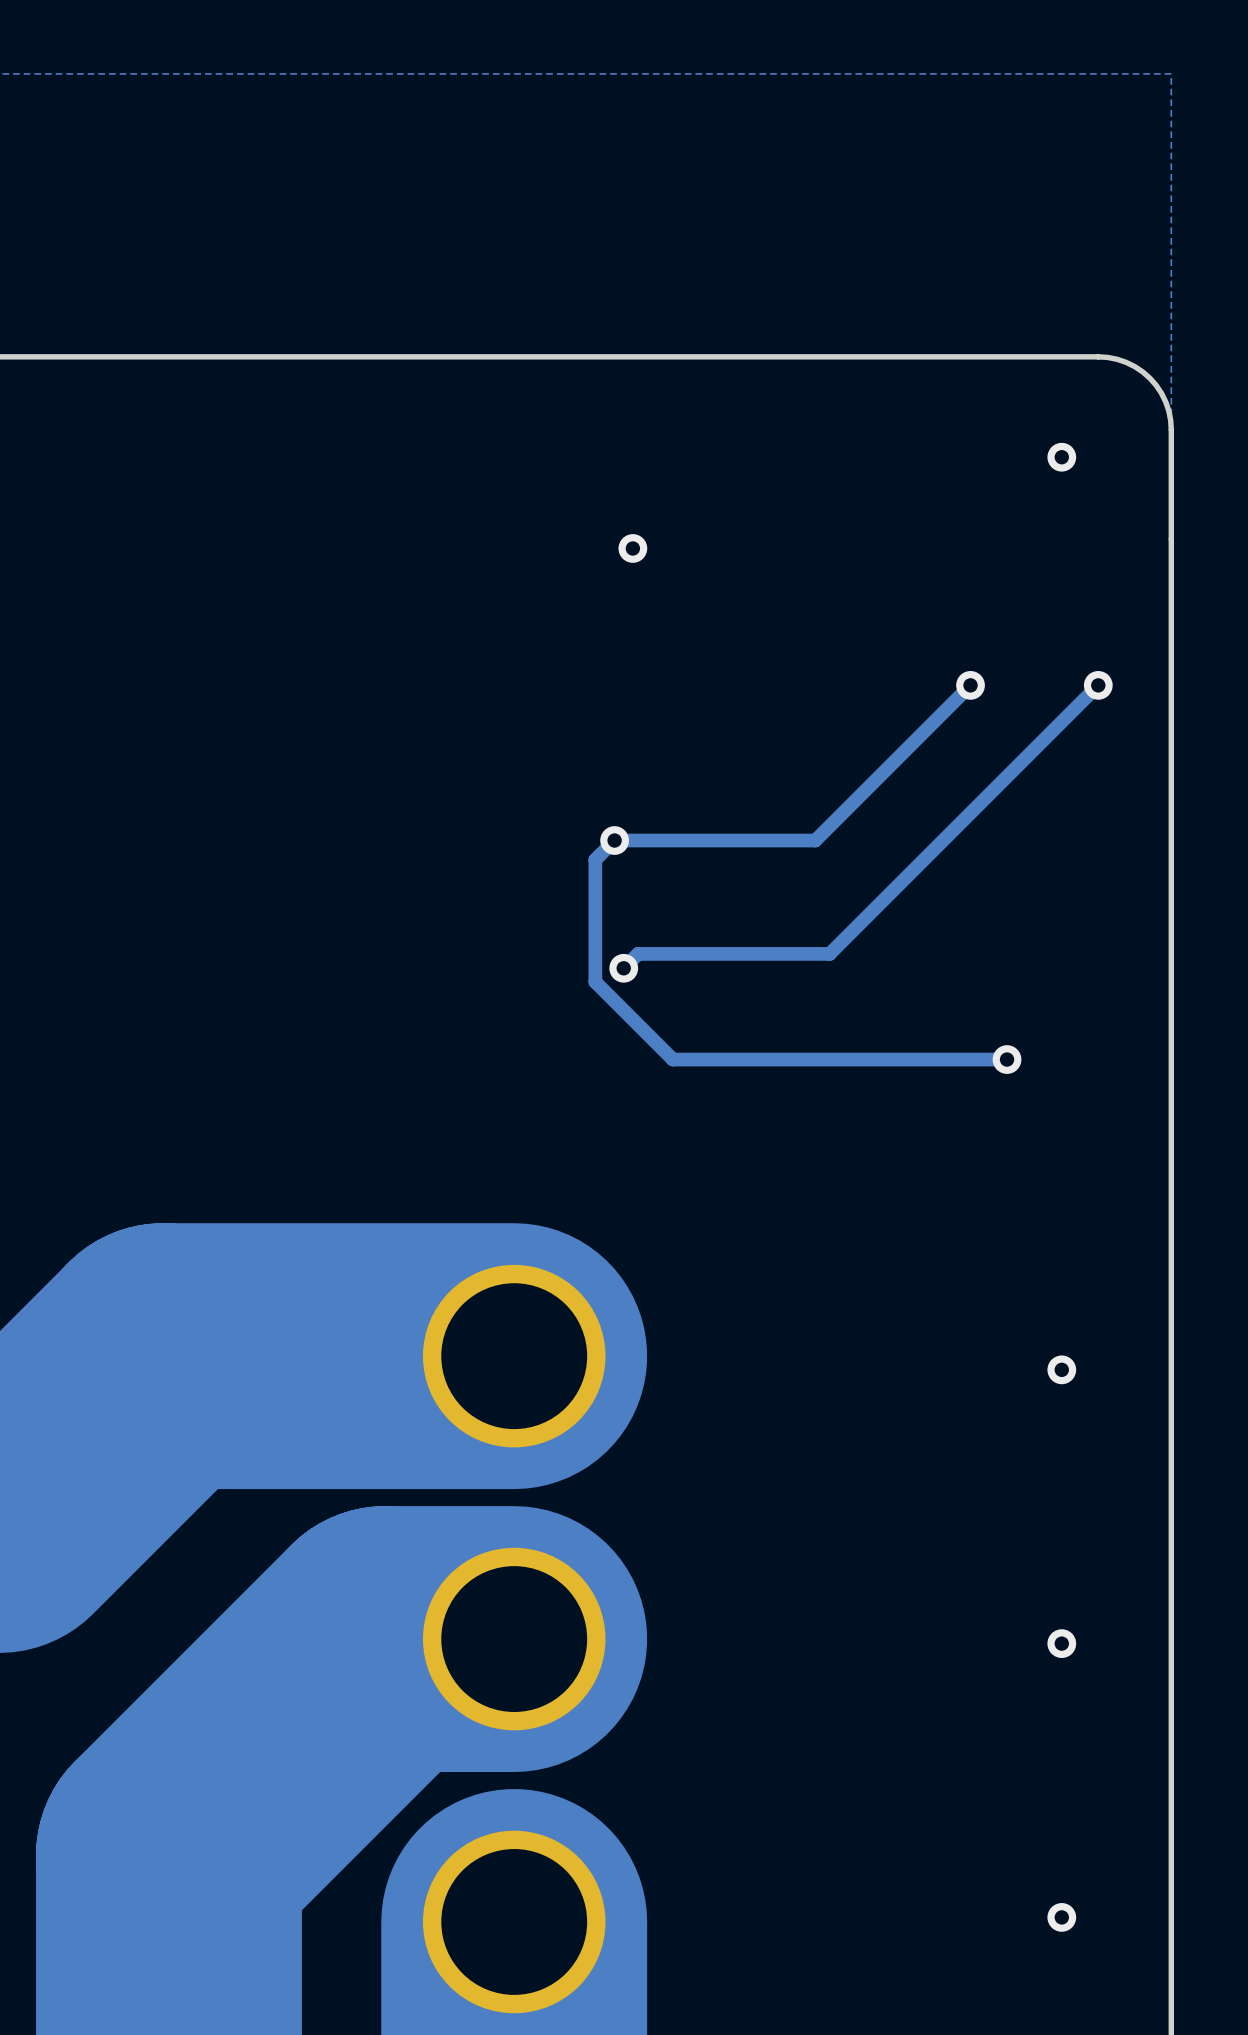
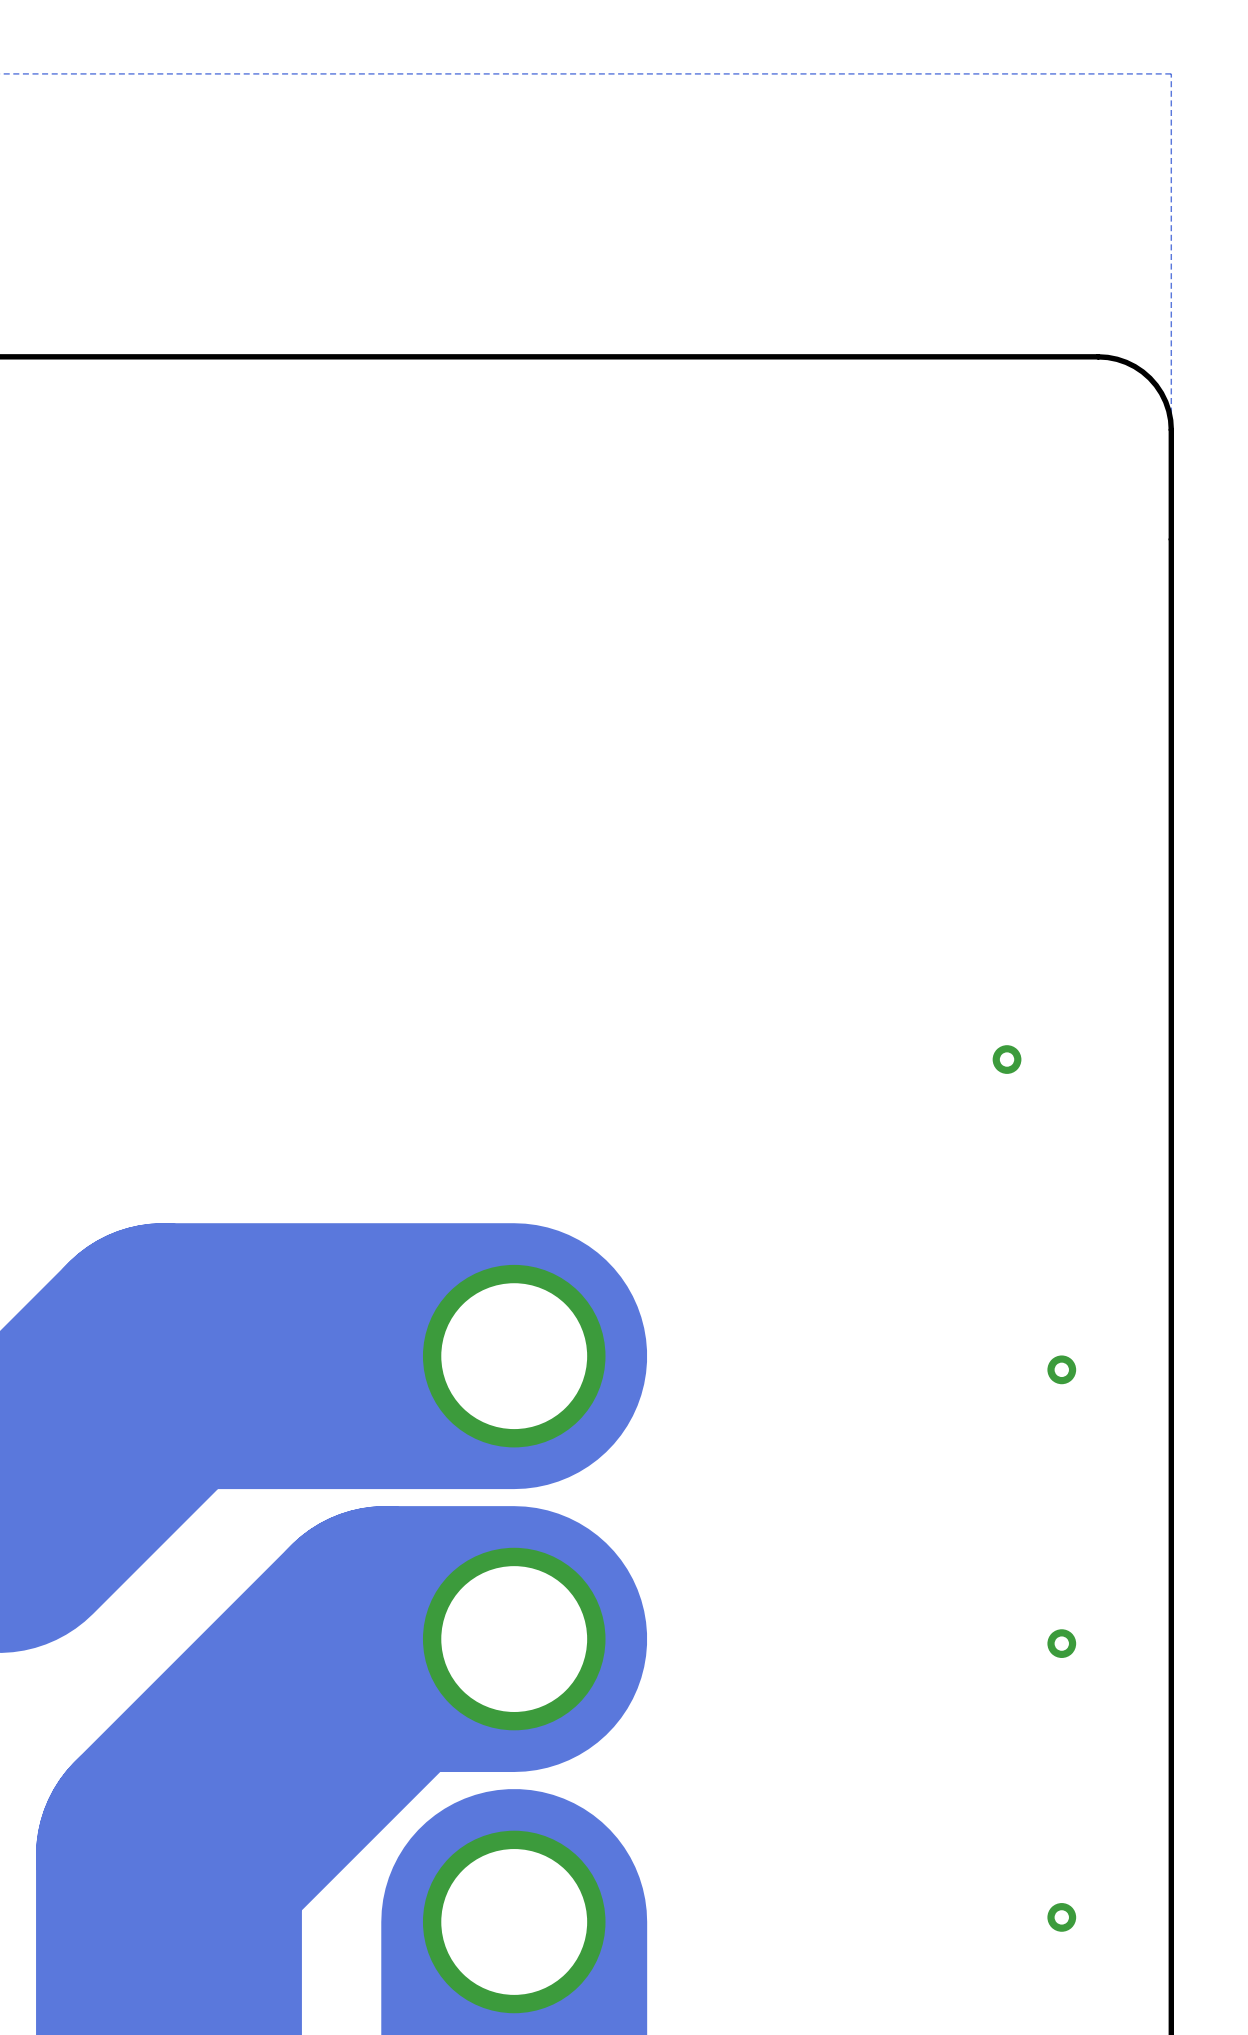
via: (1061, 457) -> none
via: (632, 548) -> none
track: (970, 685) (815, 840) (614, 840) (595, 859) (595, 981) (672, 1059) (1007, 1059) -> none
via: (970, 685) -> none
track: (1098, 685) (829, 953) (638, 953) (623, 968) -> none
via: (1098, 685) -> none
via: (614, 840) -> none
via: (623, 968) -> none

